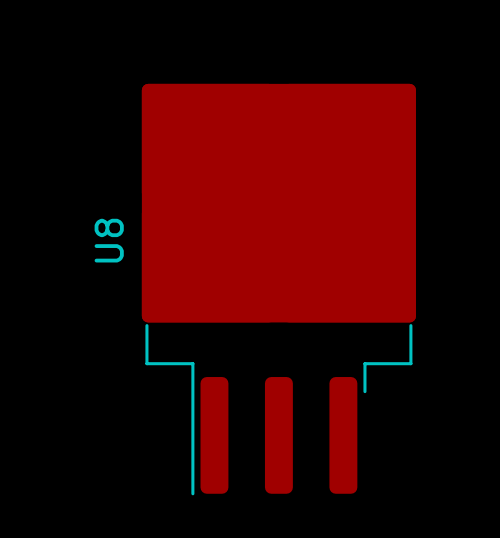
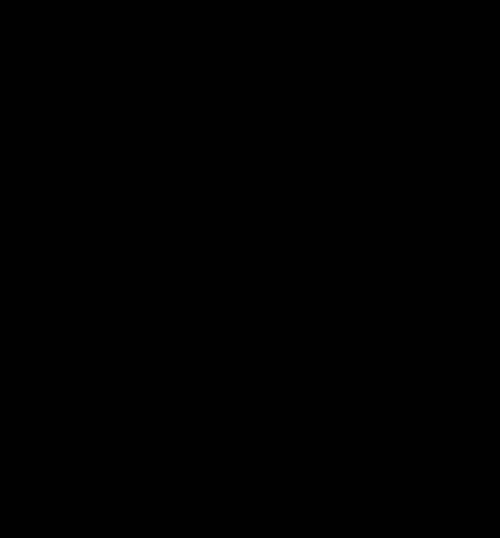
U8: (278, 289) -> none

